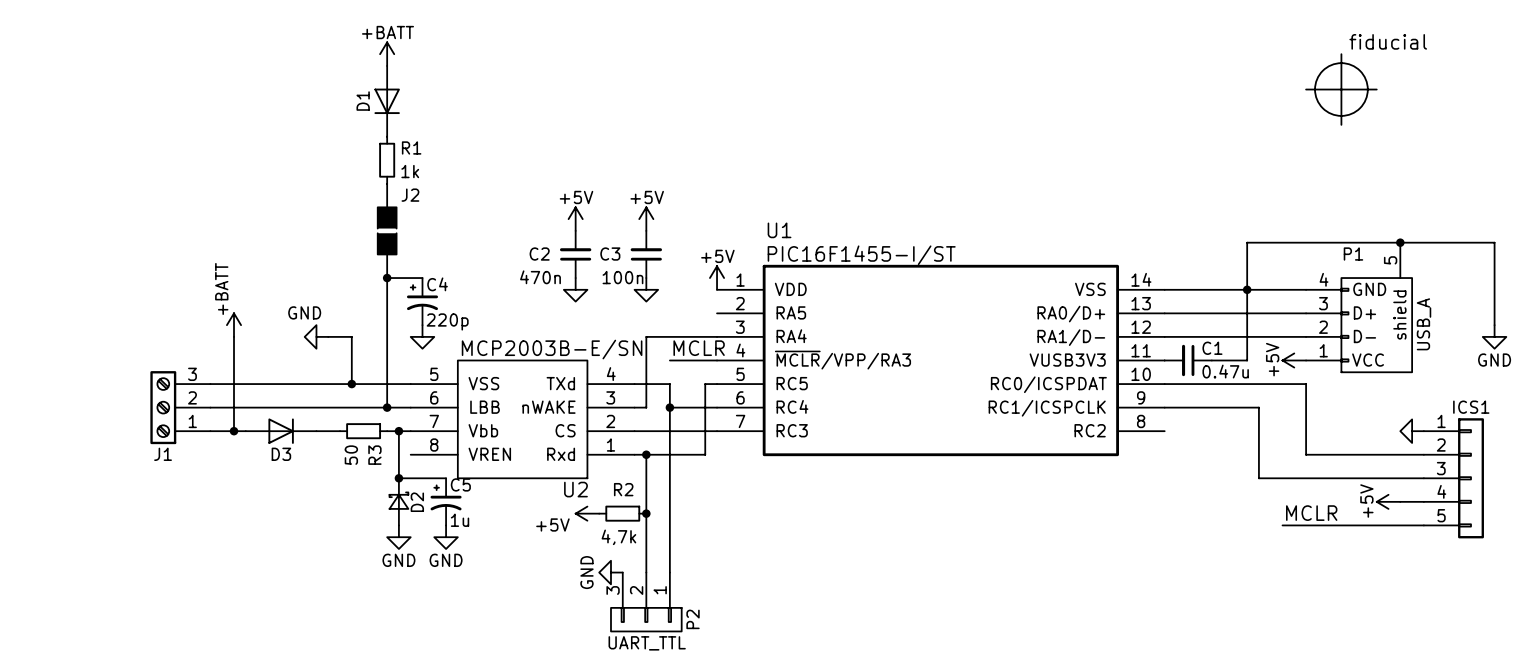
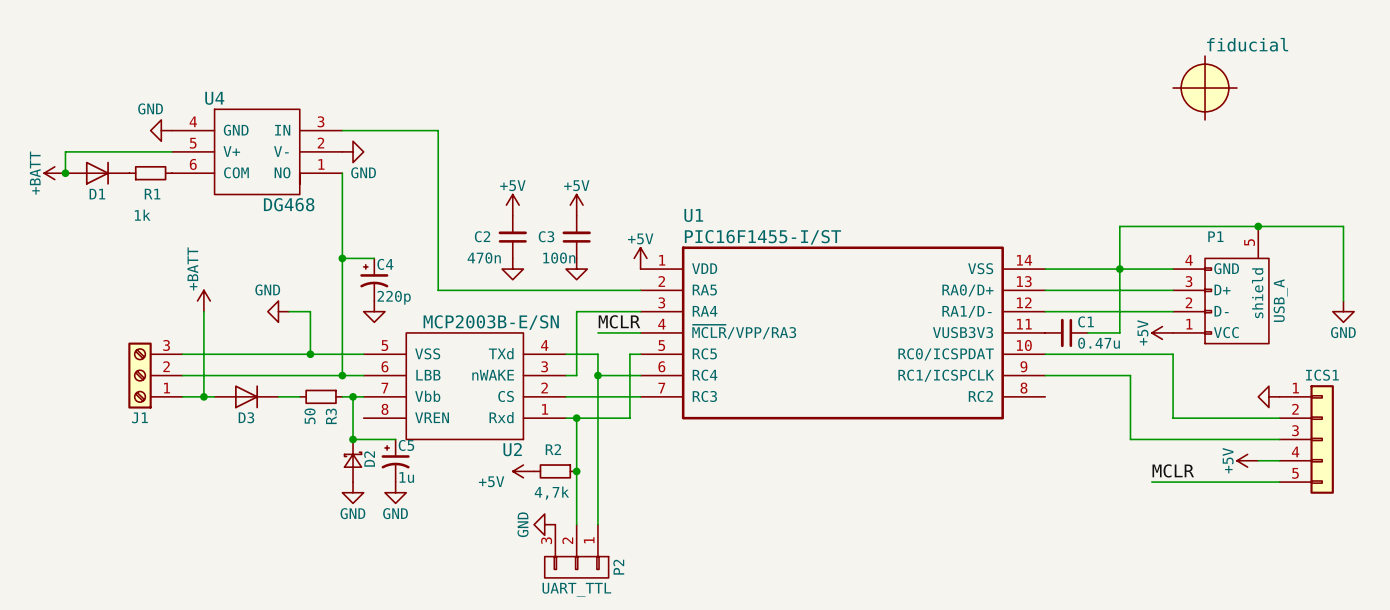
power symbol: +BATT (387, 54) -> none
D1 rotation: 0° (387, 101) -> 90° counterclockwise (97, 173)
D1 position: (387, 101) -> (97, 173)
power symbol: none -> GND (161, 130)
wire: none -> (342, 130) (438, 130) (438, 290) (640, 290)
wire: none -> (171, 151) (65, 151) (65, 173)
U4: none -> DG468 (257, 151)
R1 rotation: 0° (387, 160) -> 90° clockwise (150, 173)
R1 position: (387, 160) -> (150, 173)
power symbol: none -> GND (353, 151)
R1 value position: 1k (410, 171) -> 1k (142, 215)
power symbol: none -> +BATT (54, 173)
junction: none -> (65, 173)
J2: (387, 230) -> none

